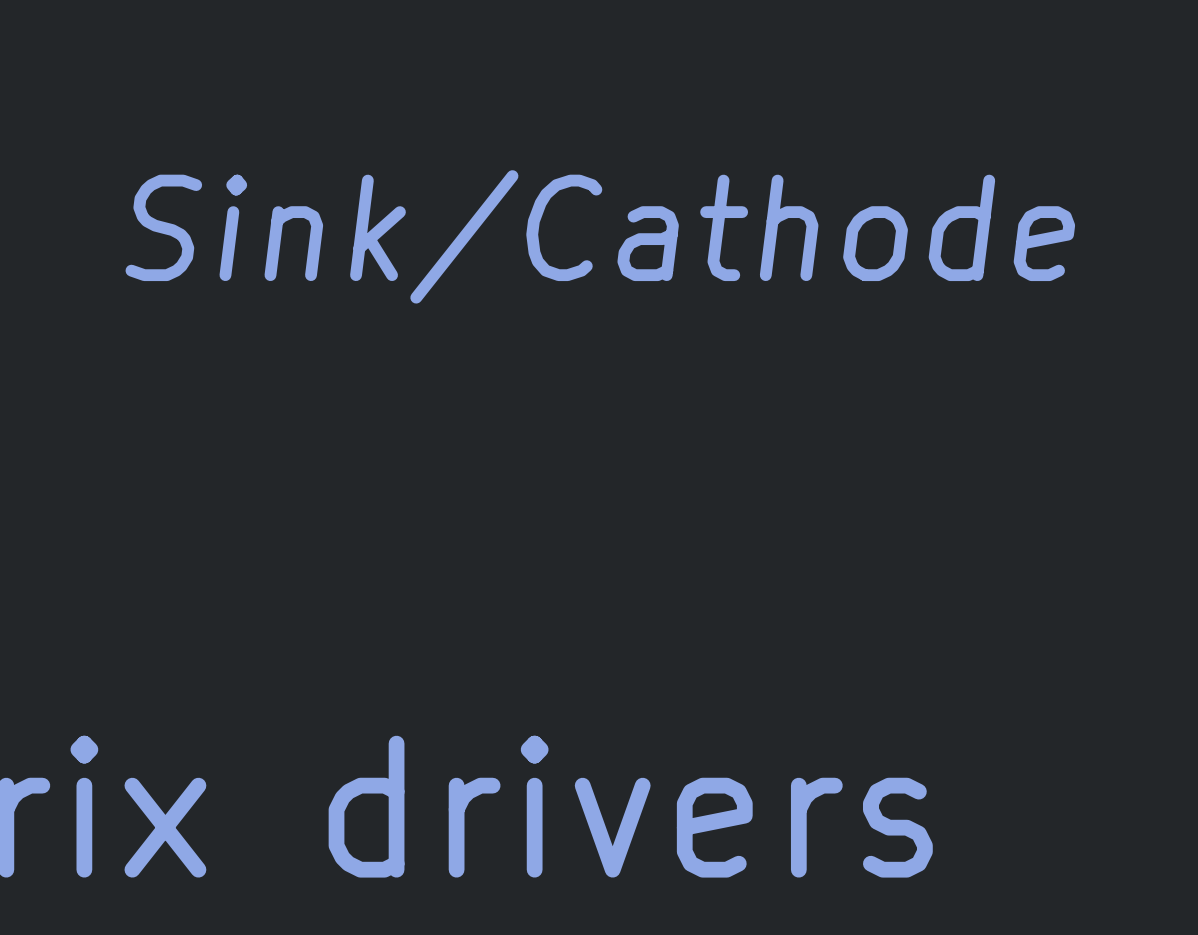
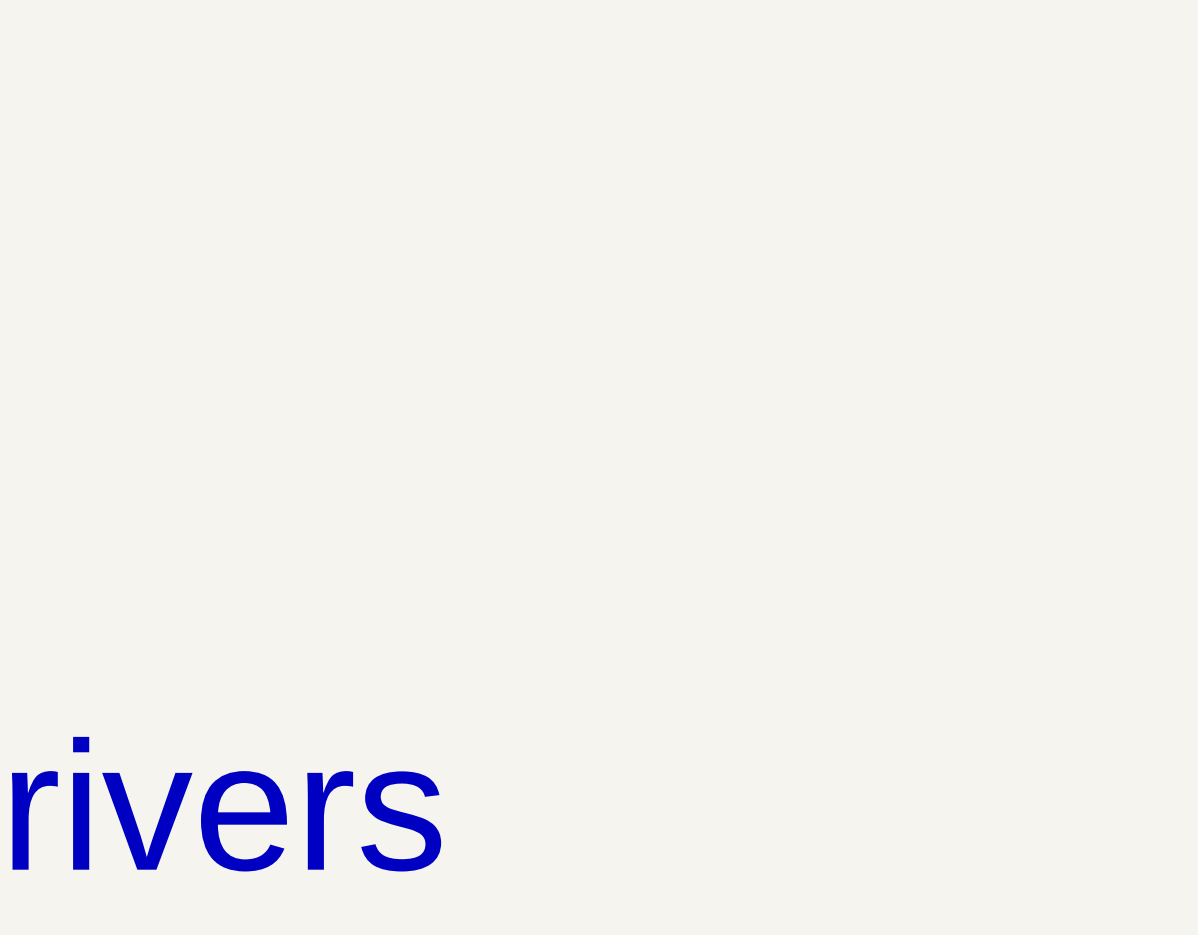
text: Sink/Cathode (600, 236) -> none

